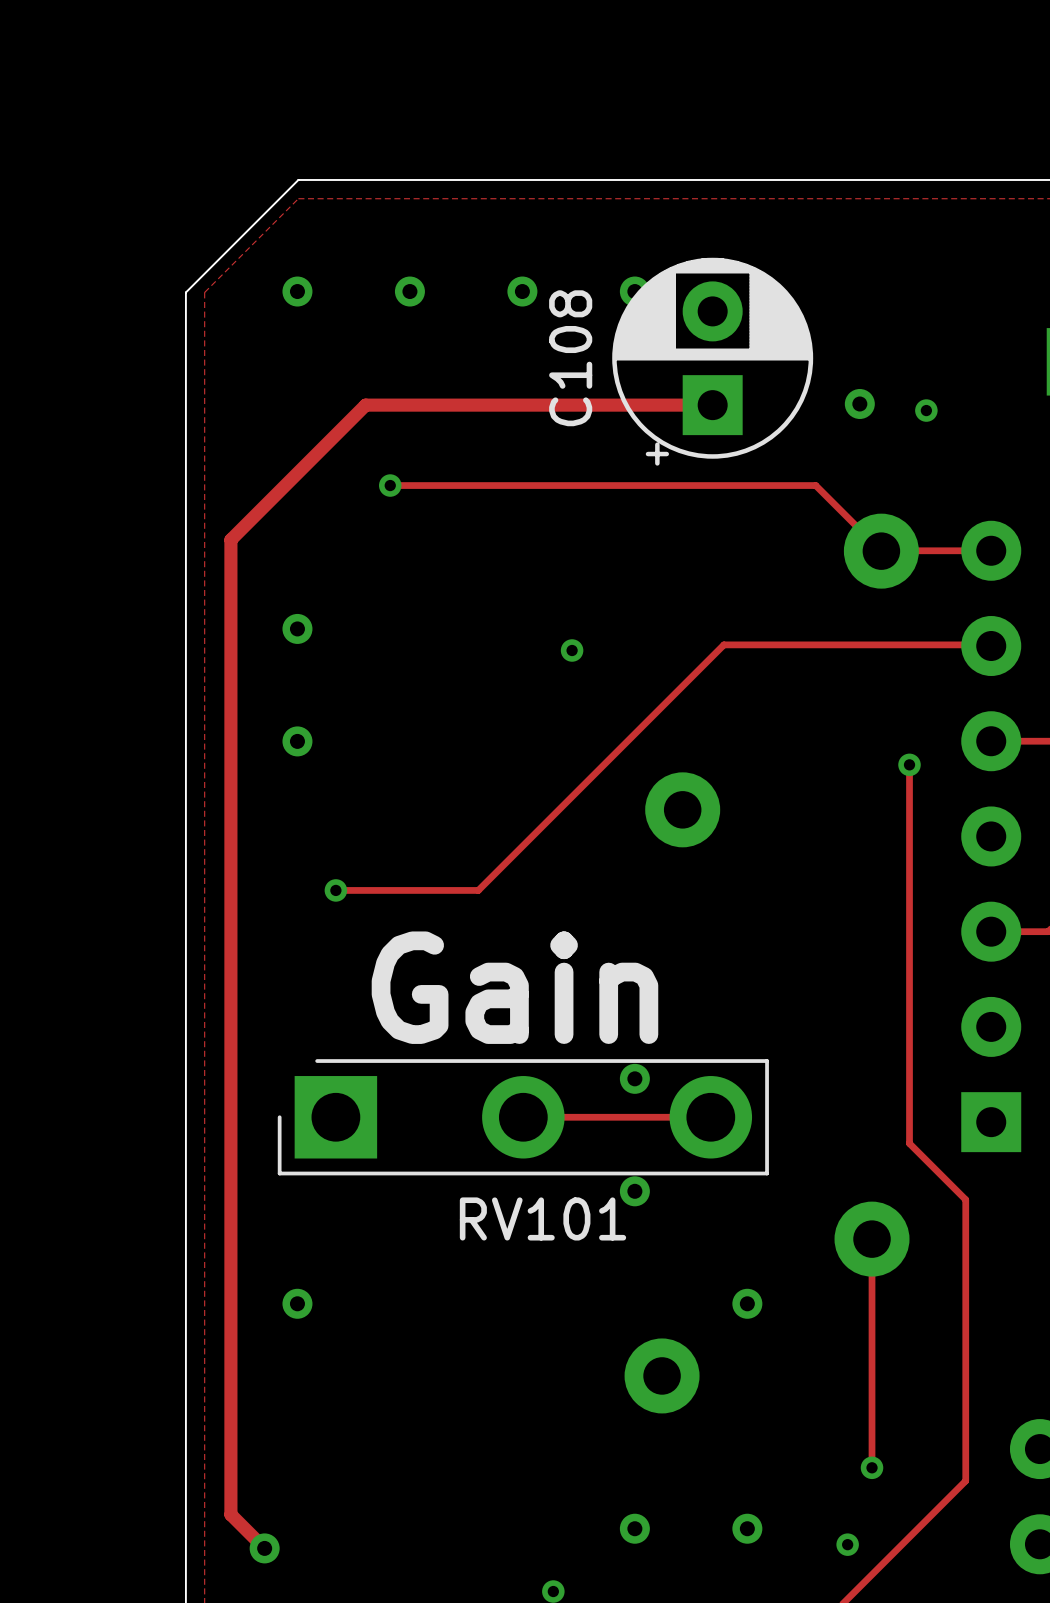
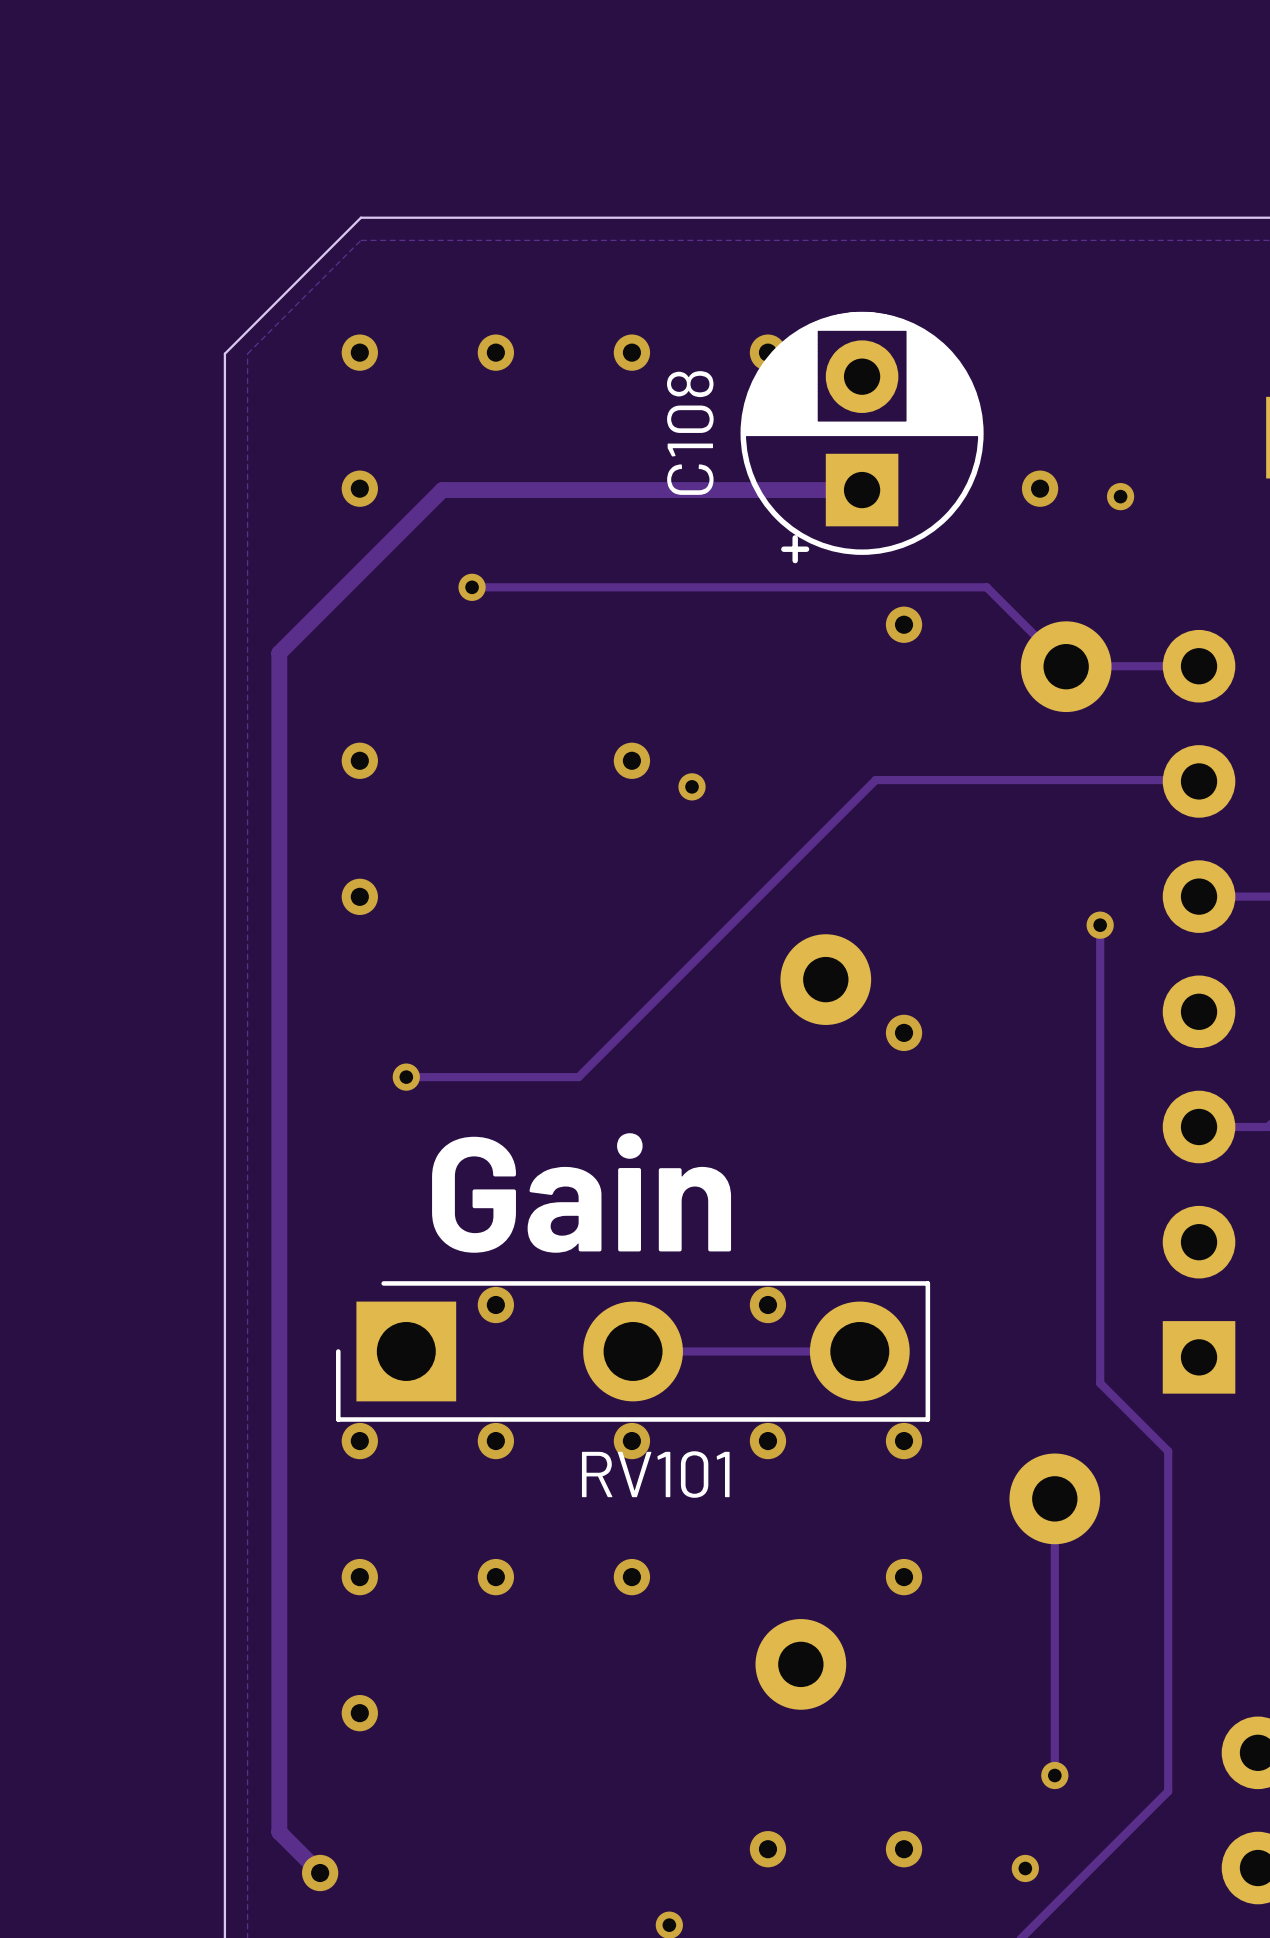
via: none -> (359, 488)
via: none -> (904, 624)
via: none -> (631, 760)
via: none -> (904, 1032)
via: none -> (495, 1304)
via: none -> (359, 1441)
via: none -> (495, 1441)
via: none -> (631, 1441)
via: none -> (904, 1441)
via: none -> (495, 1577)
via: none -> (631, 1577)
via: none -> (359, 1713)

